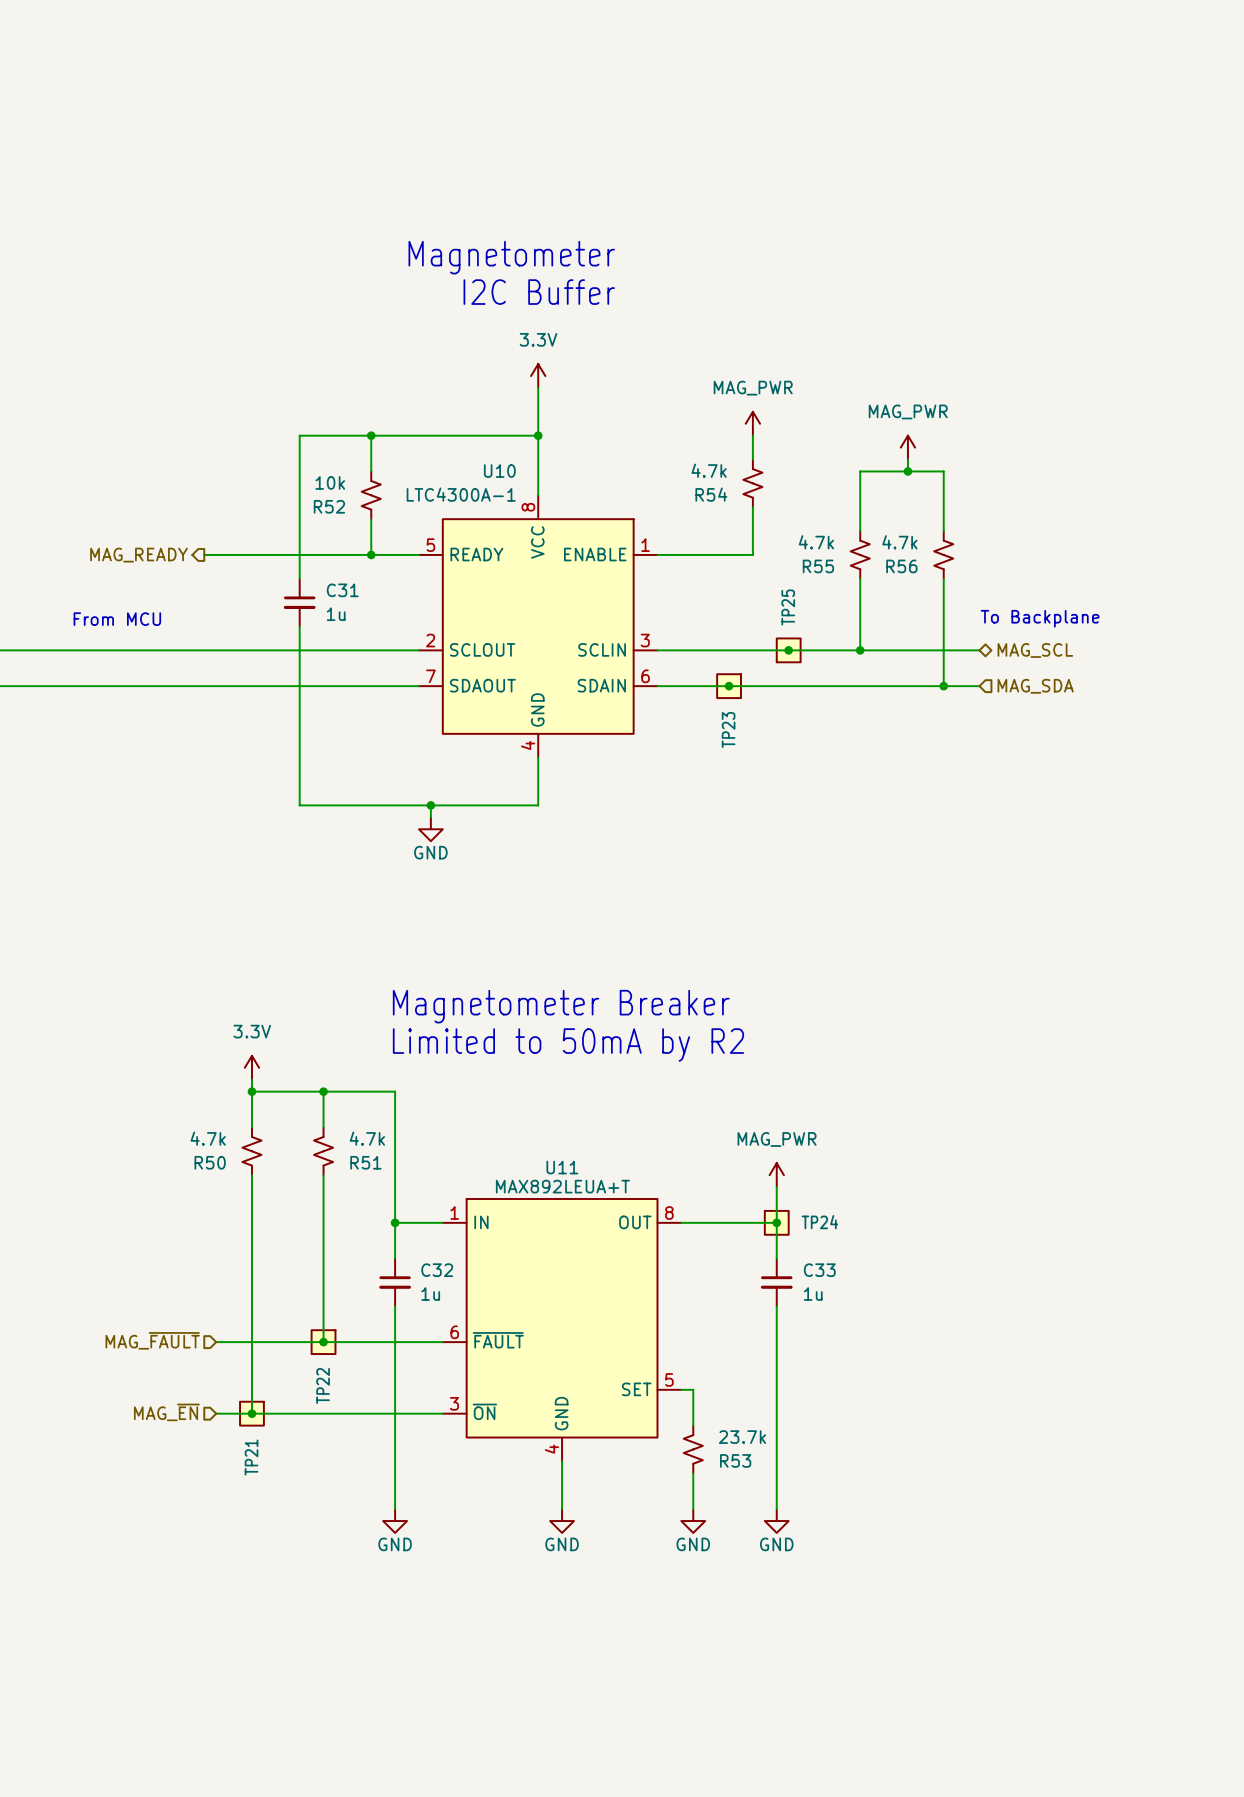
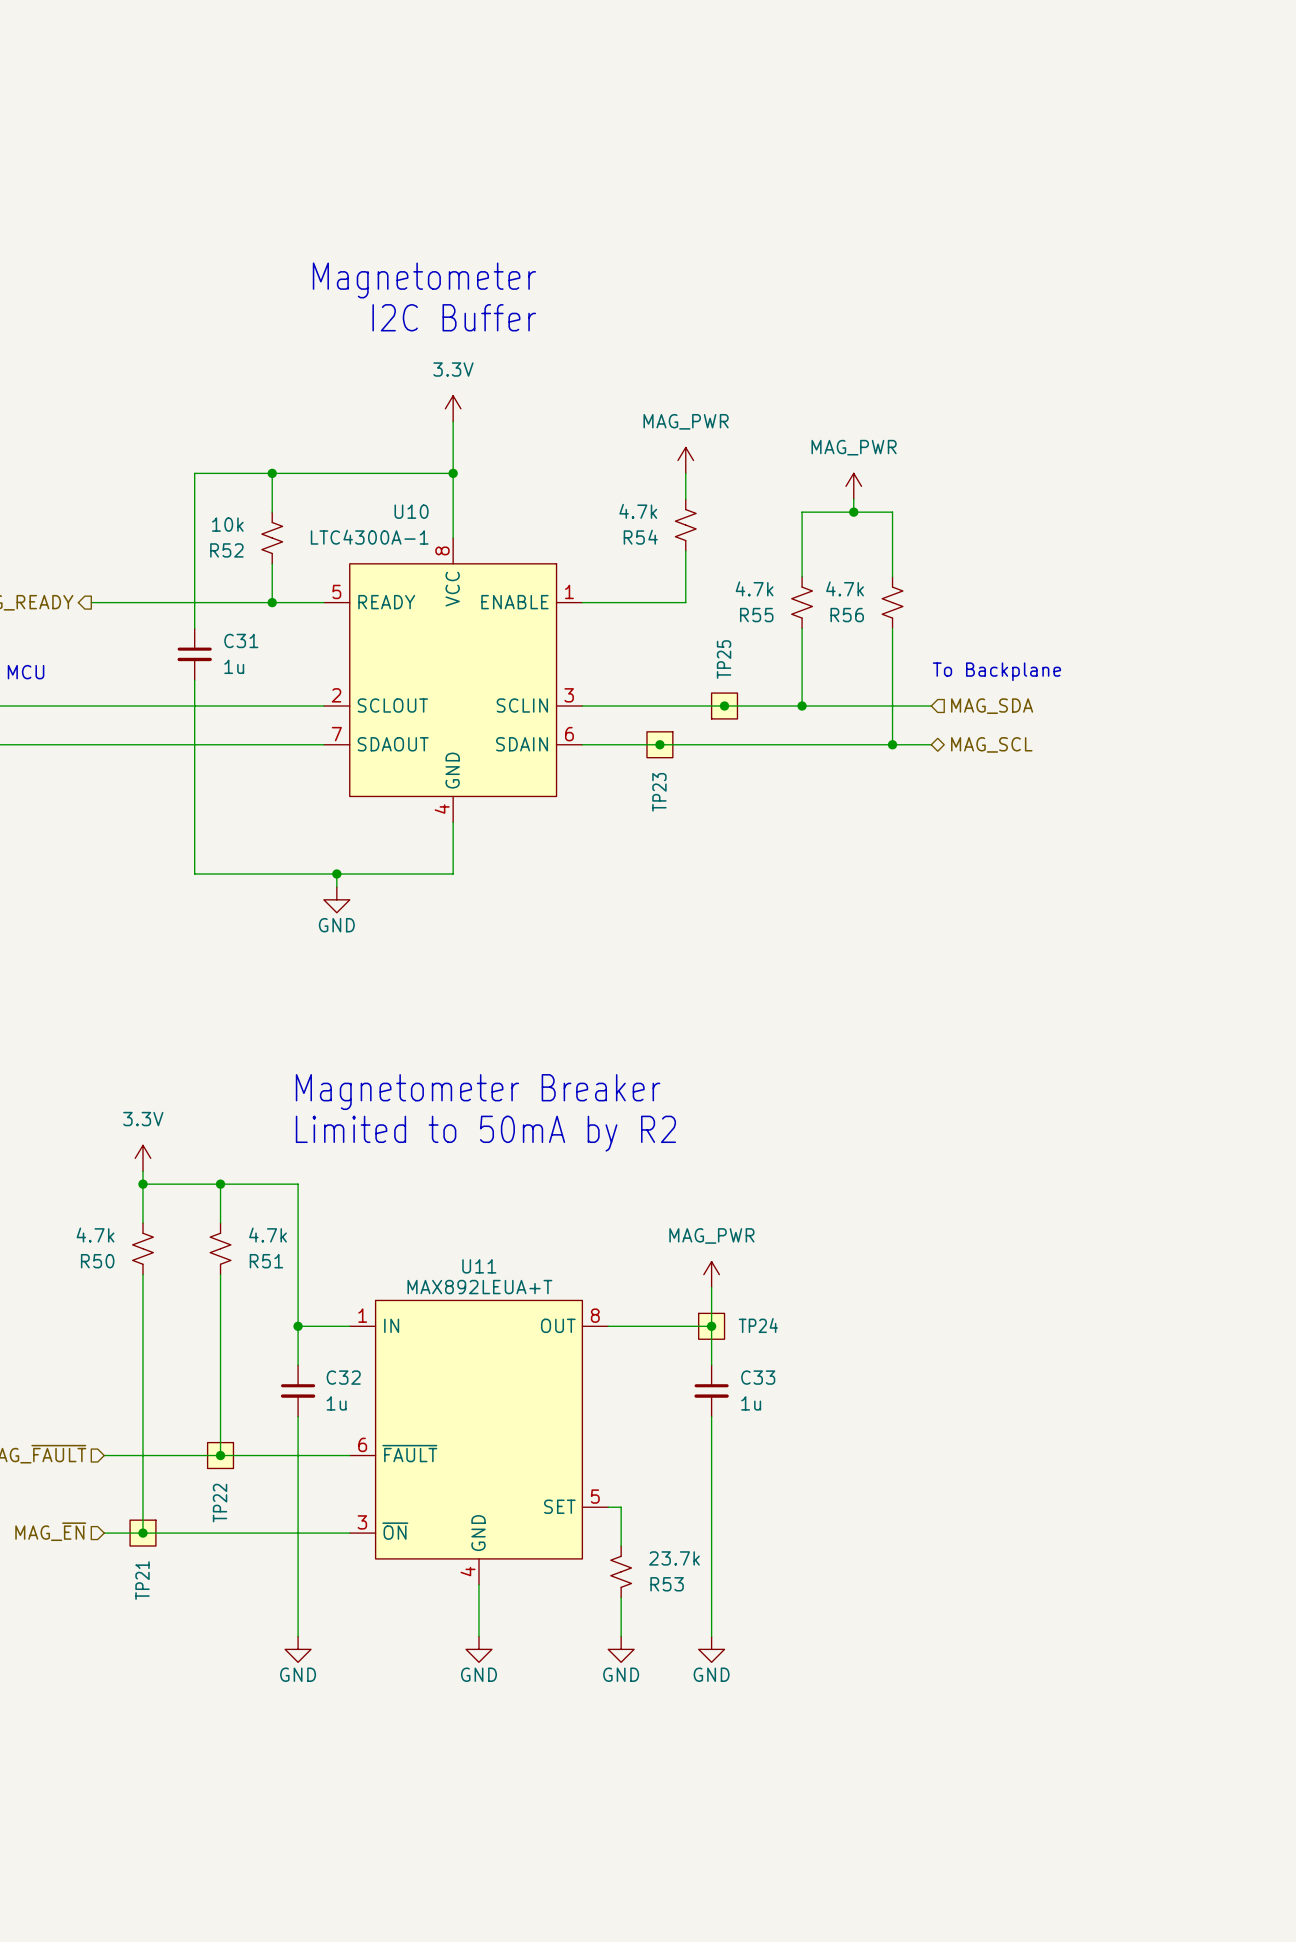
hierarchical label shape: bidirectional (1035, 650) -> input (992, 706)
hierarchical label: MAG_SCL (1035, 650) -> MAG_SDA (992, 706)
hierarchical label shape: input (1035, 686) -> bidirectional (991, 744)
hierarchical label: MAG_SDA (1035, 686) -> MAG_SCL (991, 744)

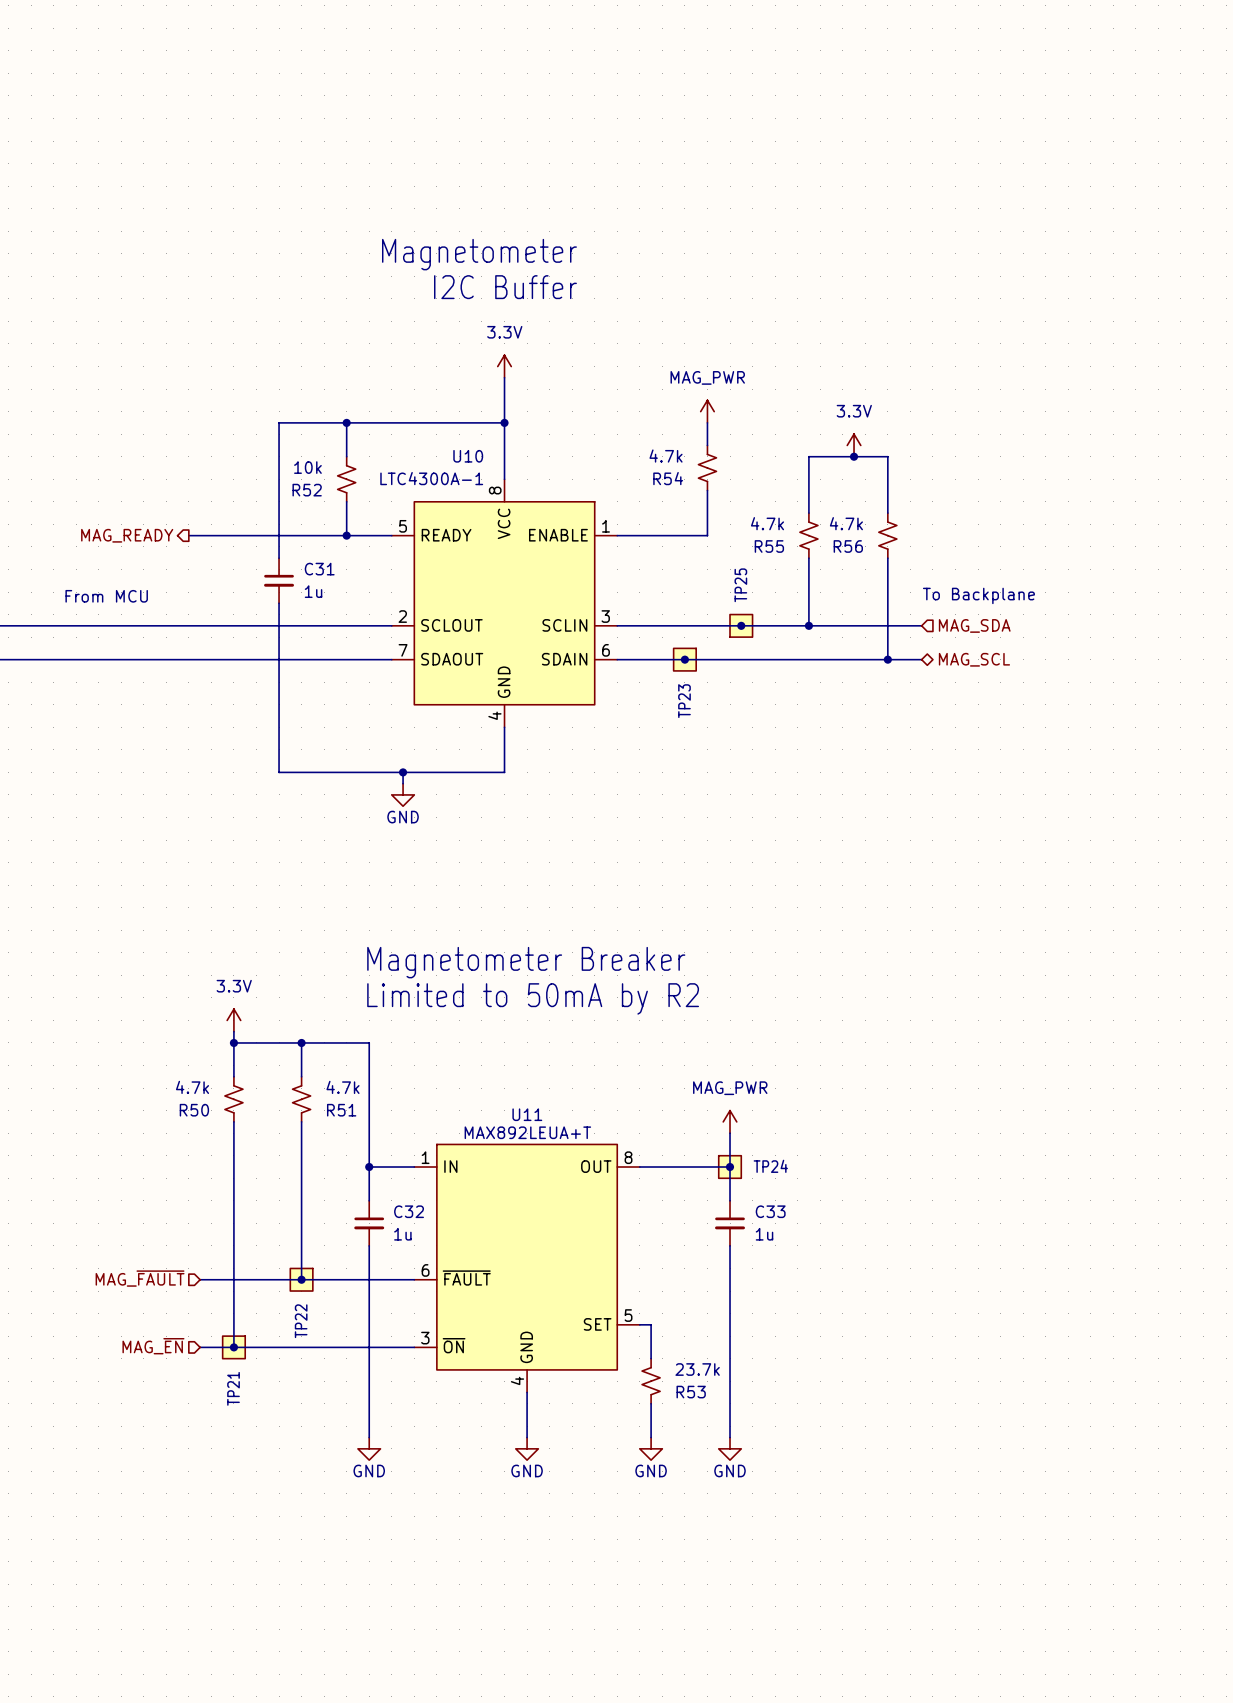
power symbol: MAG_PWR (853, 486) -> none
power symbol: none -> 3.3V (854, 445)

